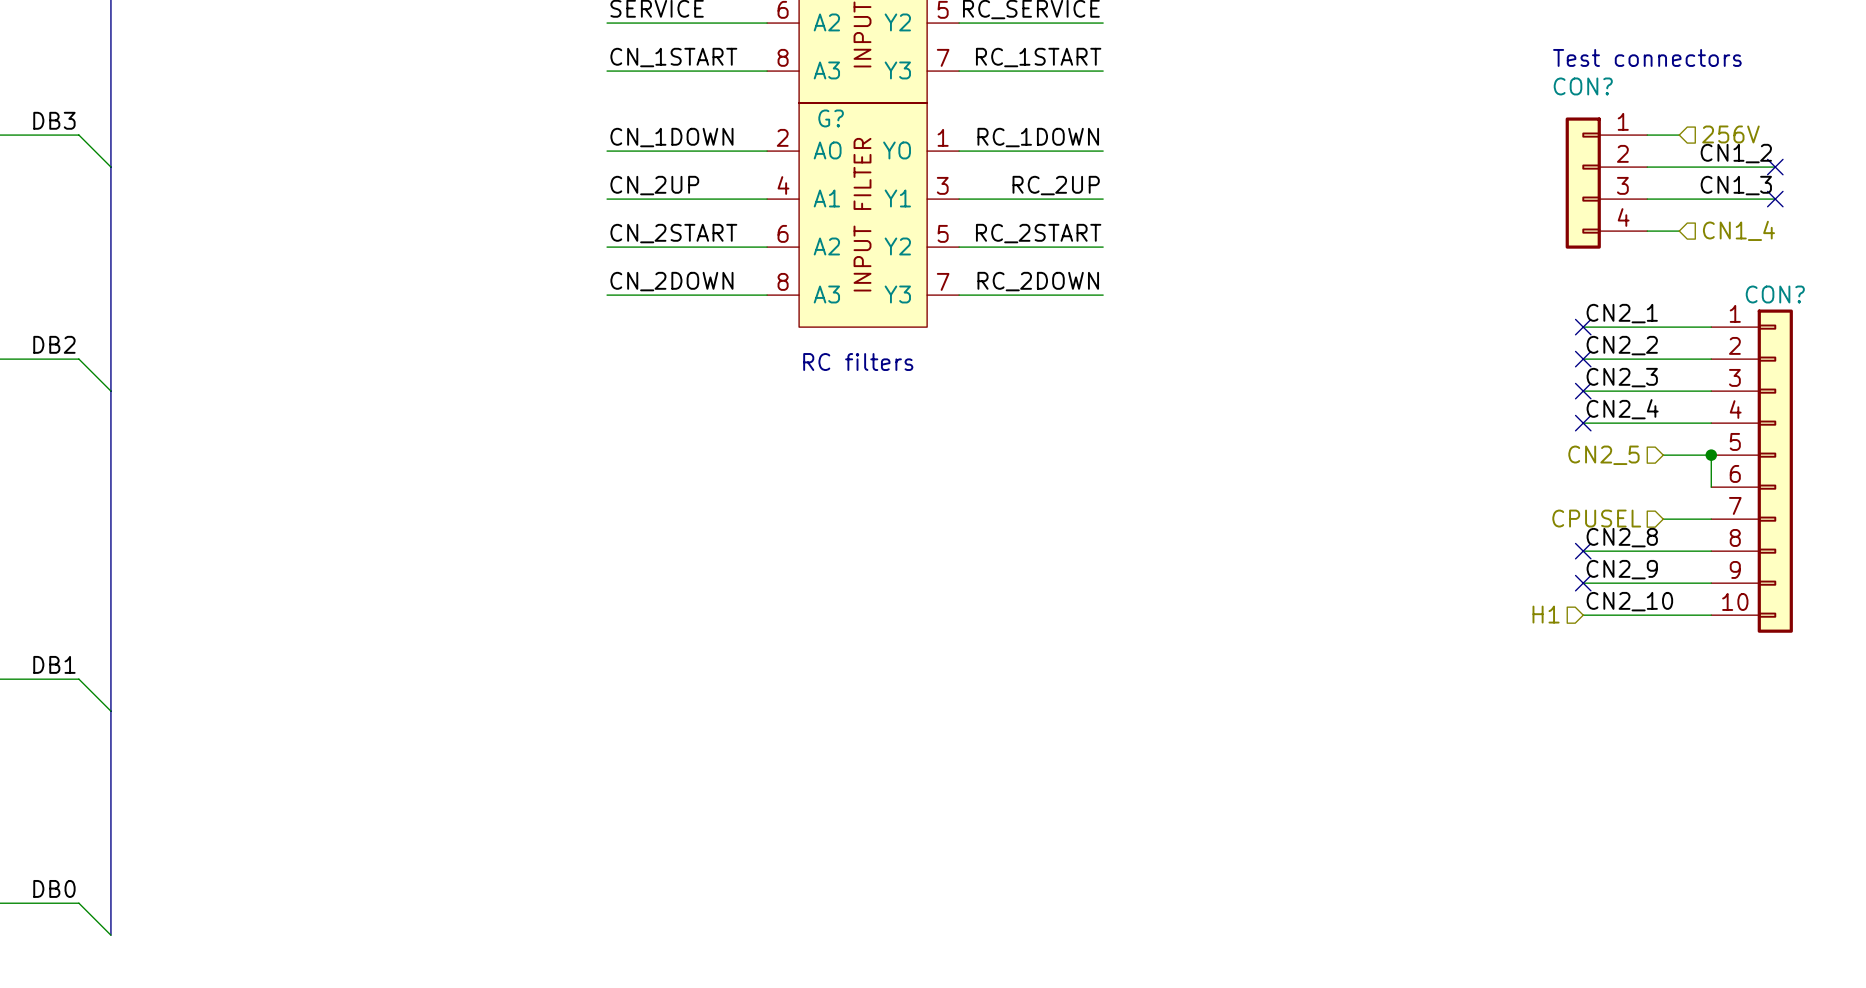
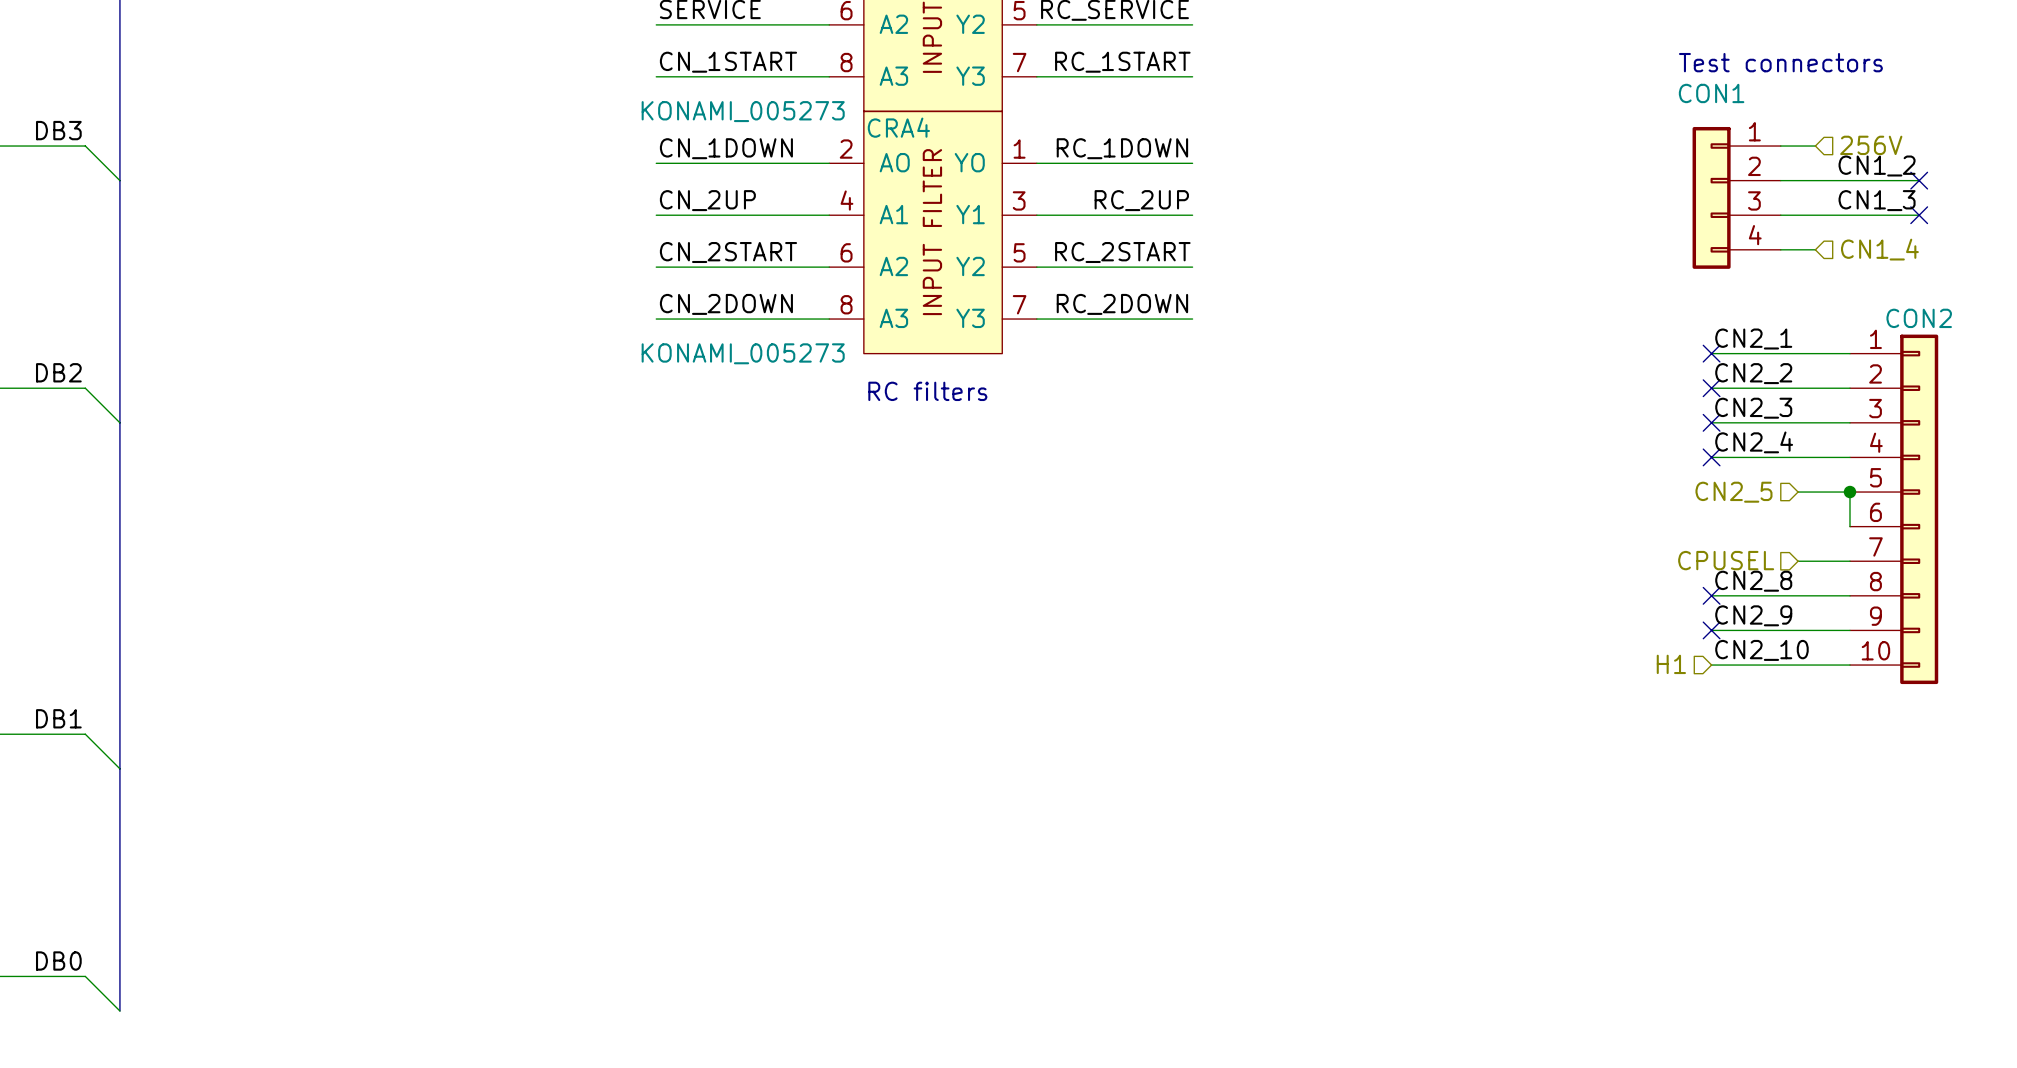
CON? name: CON? (1583, 86) -> CON1 (1711, 93)
part value: none -> KONAMI_005273 (743, 111)
G? name: G? (831, 118) -> CRA4 (898, 127)
CON? name: CON? (1775, 294) -> CON2 (1919, 318)
G? value: none -> KONAMI_005273 (743, 353)

